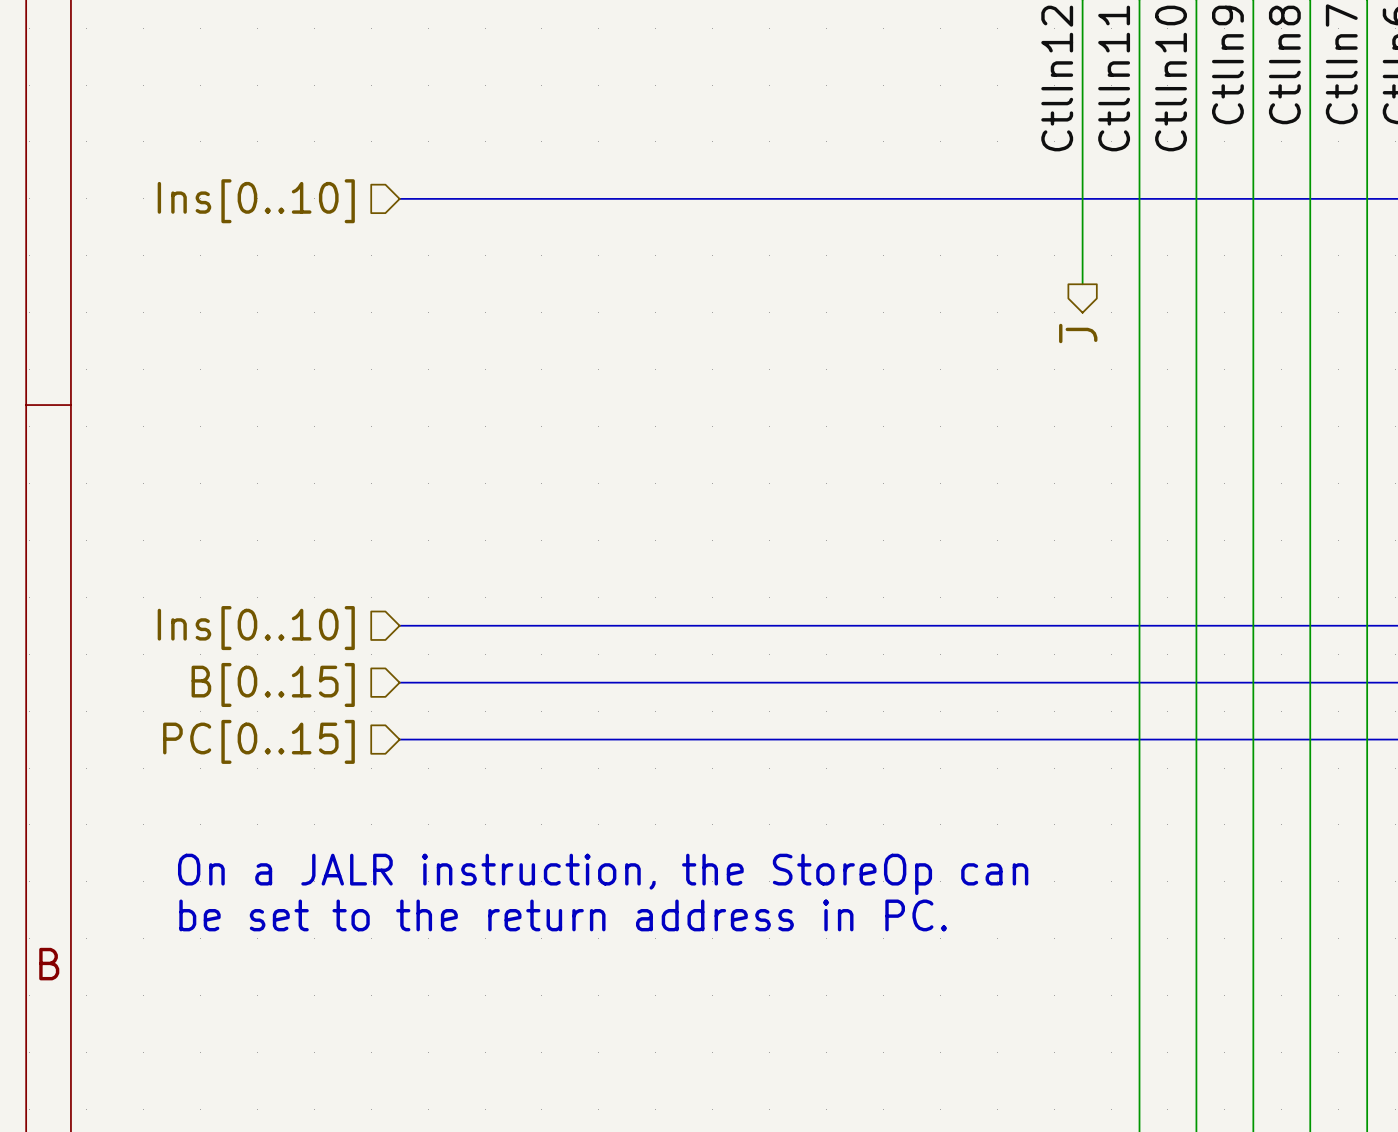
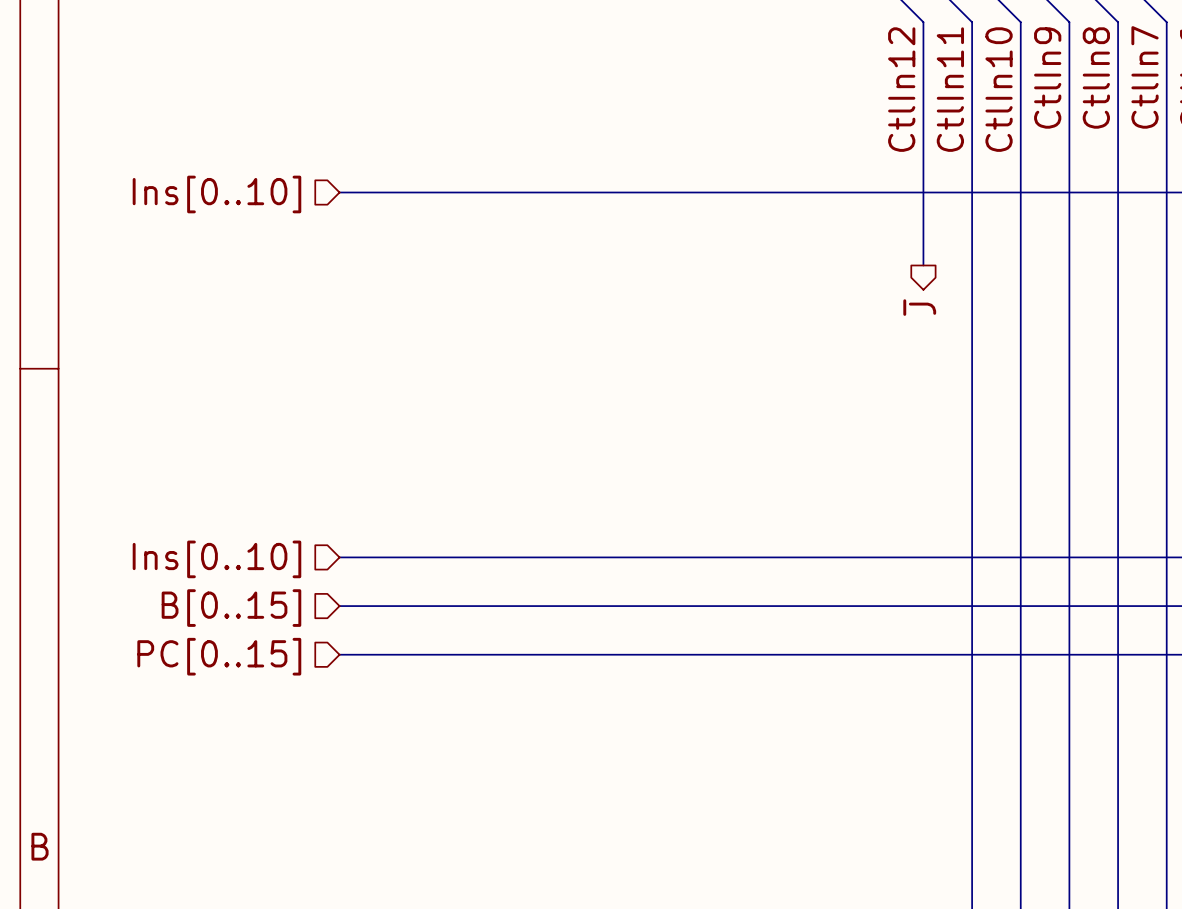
text: On a JALR instruction, the StoreOp can (603, 874) -> none
text: be set to the return address in PC. (563, 915) -> none

